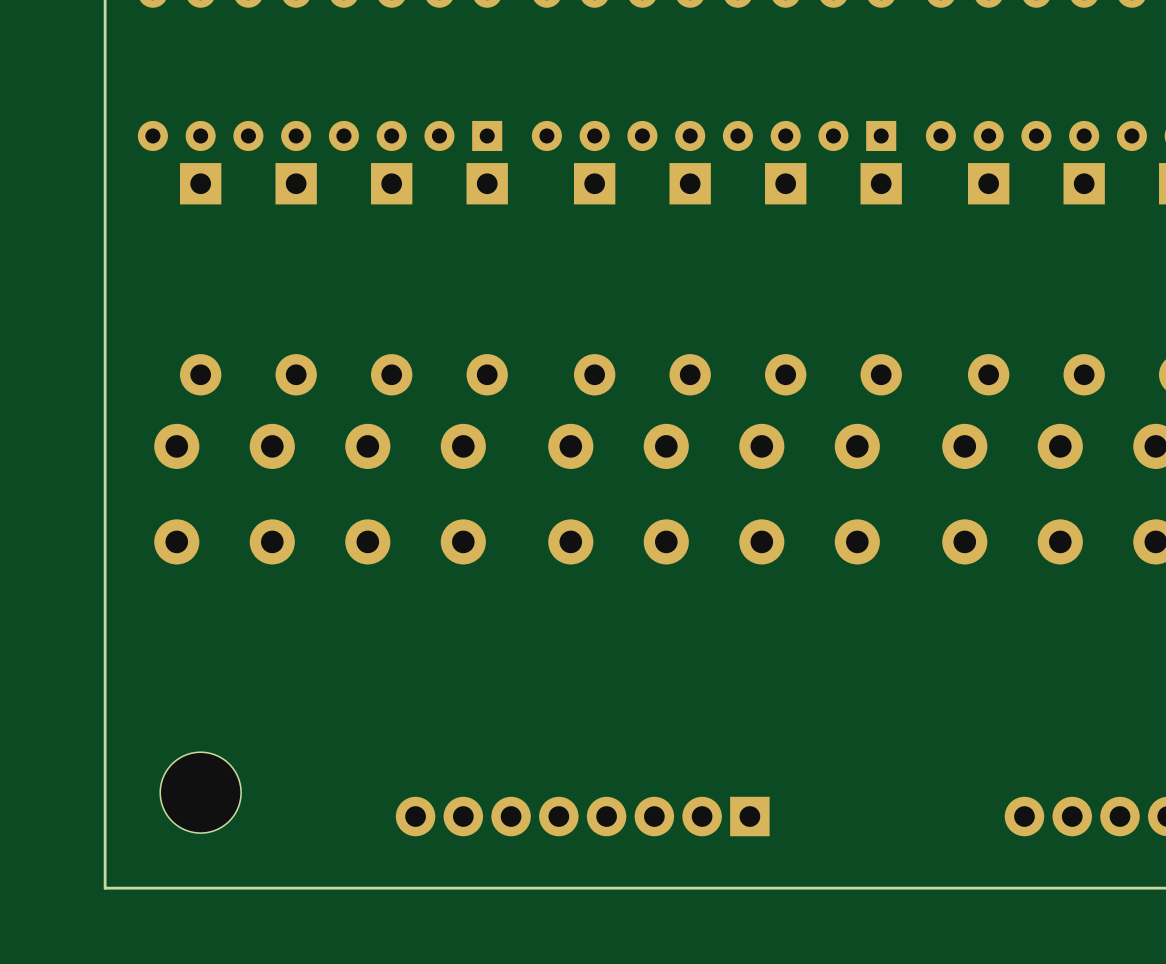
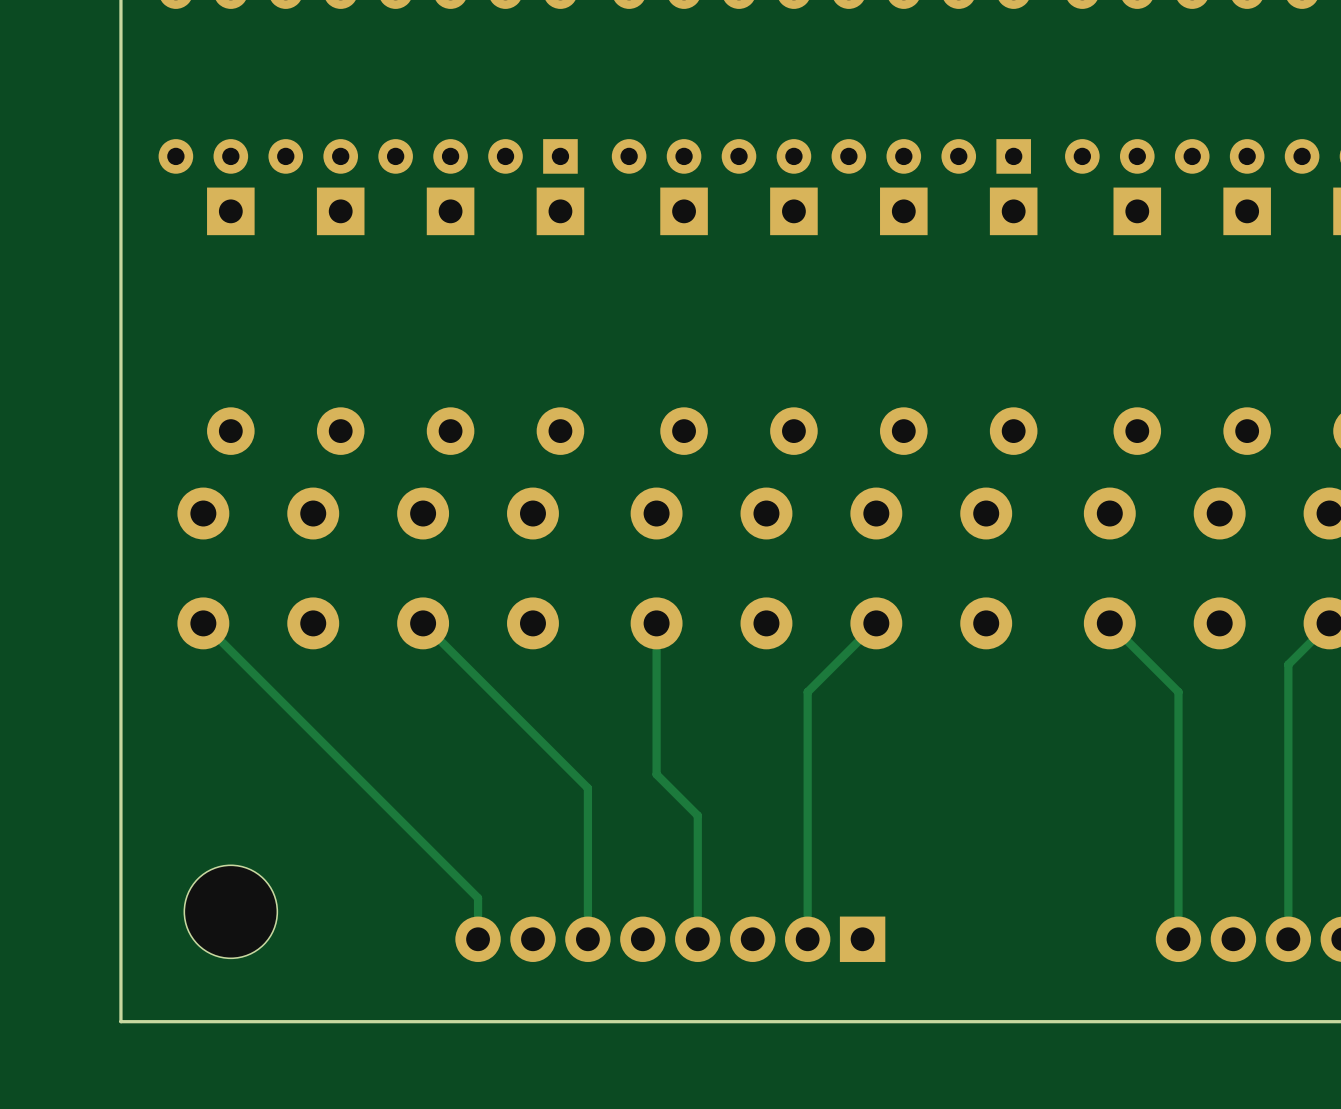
track: none -> (203, 623) (478, 898) (478, 939)
track: none -> (423, 623) (587, 788) (587, 939)
track: none -> (656, 623) (656, 774) (697, 815) (697, 939)
track: none -> (876, 623) (807, 692) (807, 939)
track: none -> (1109, 623) (1178, 692) (1178, 939)
track: none -> (1329, 623) (1288, 664) (1288, 939)

